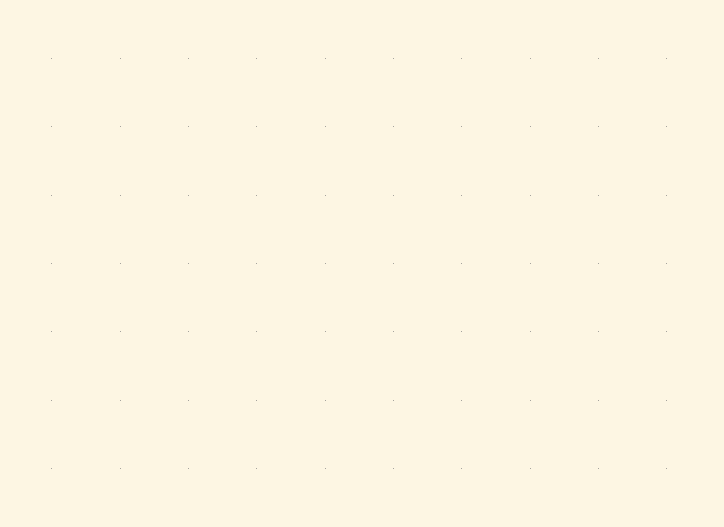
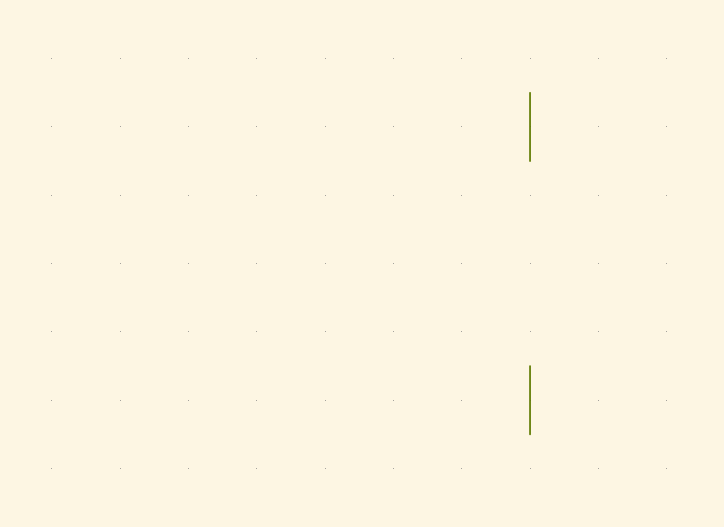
wire: none -> (530, 92) (530, 161)
wire: none -> (530, 366) (530, 434)

